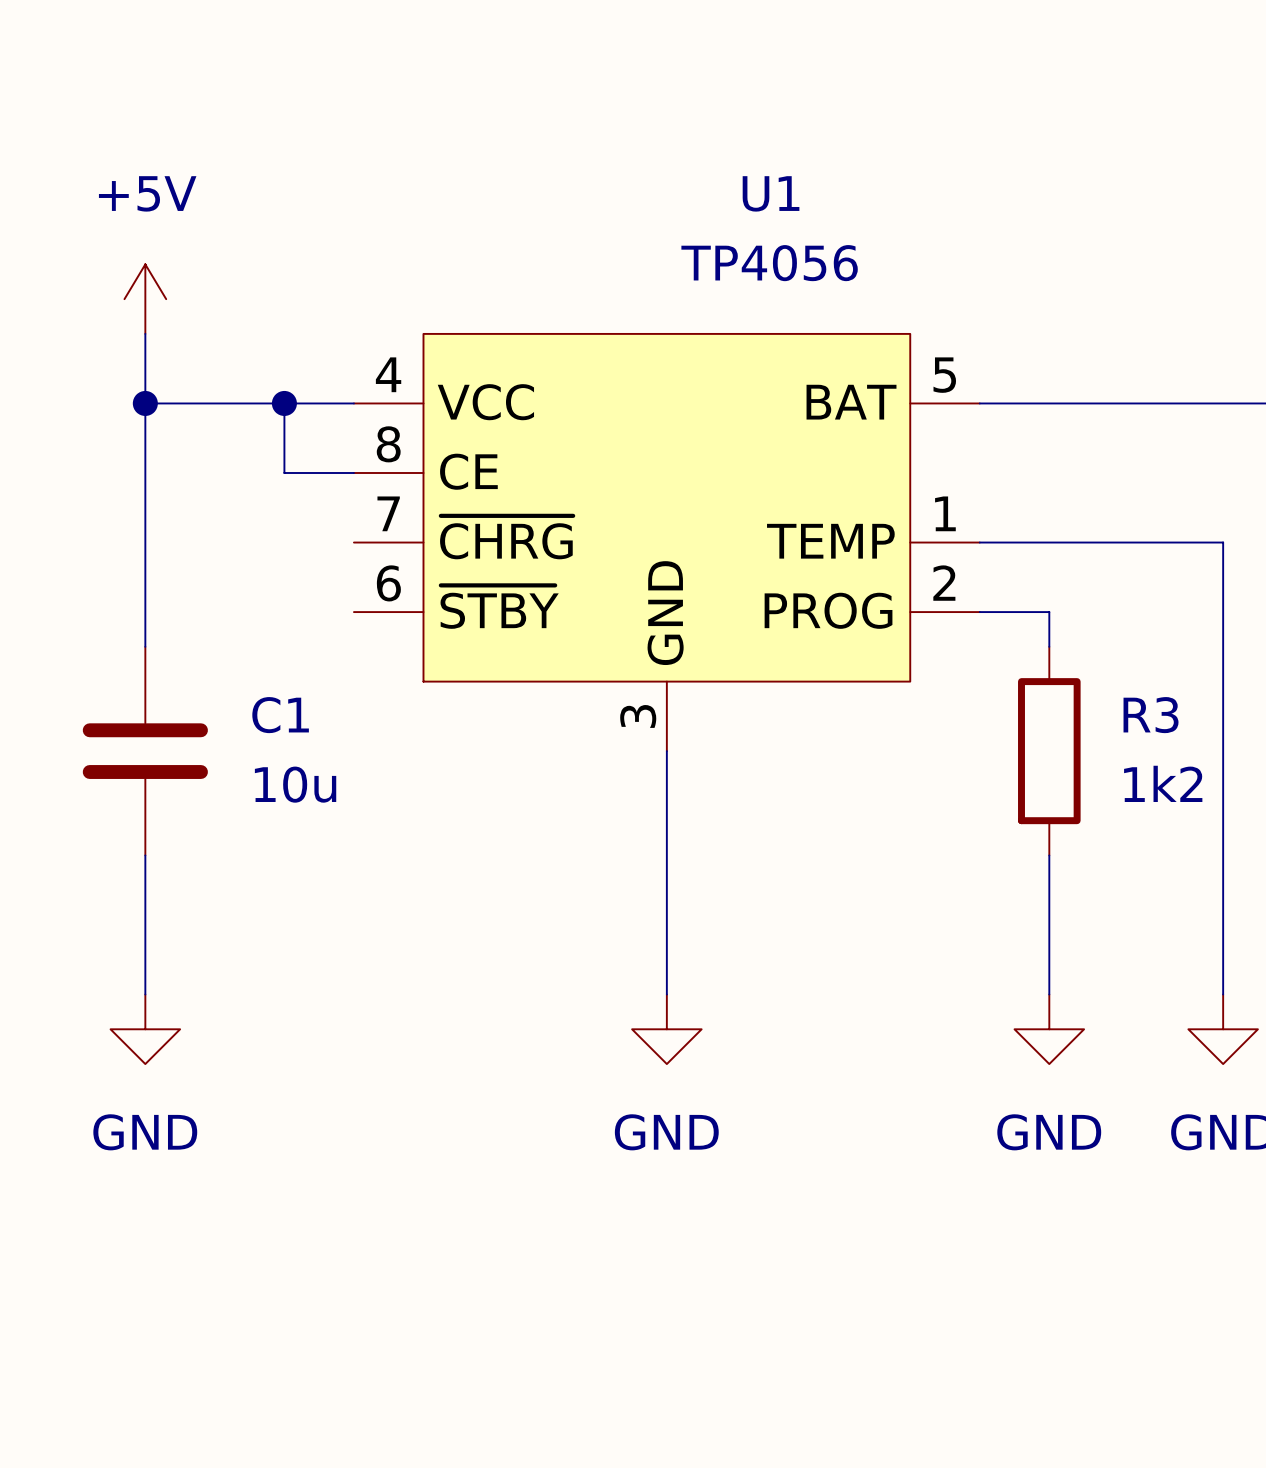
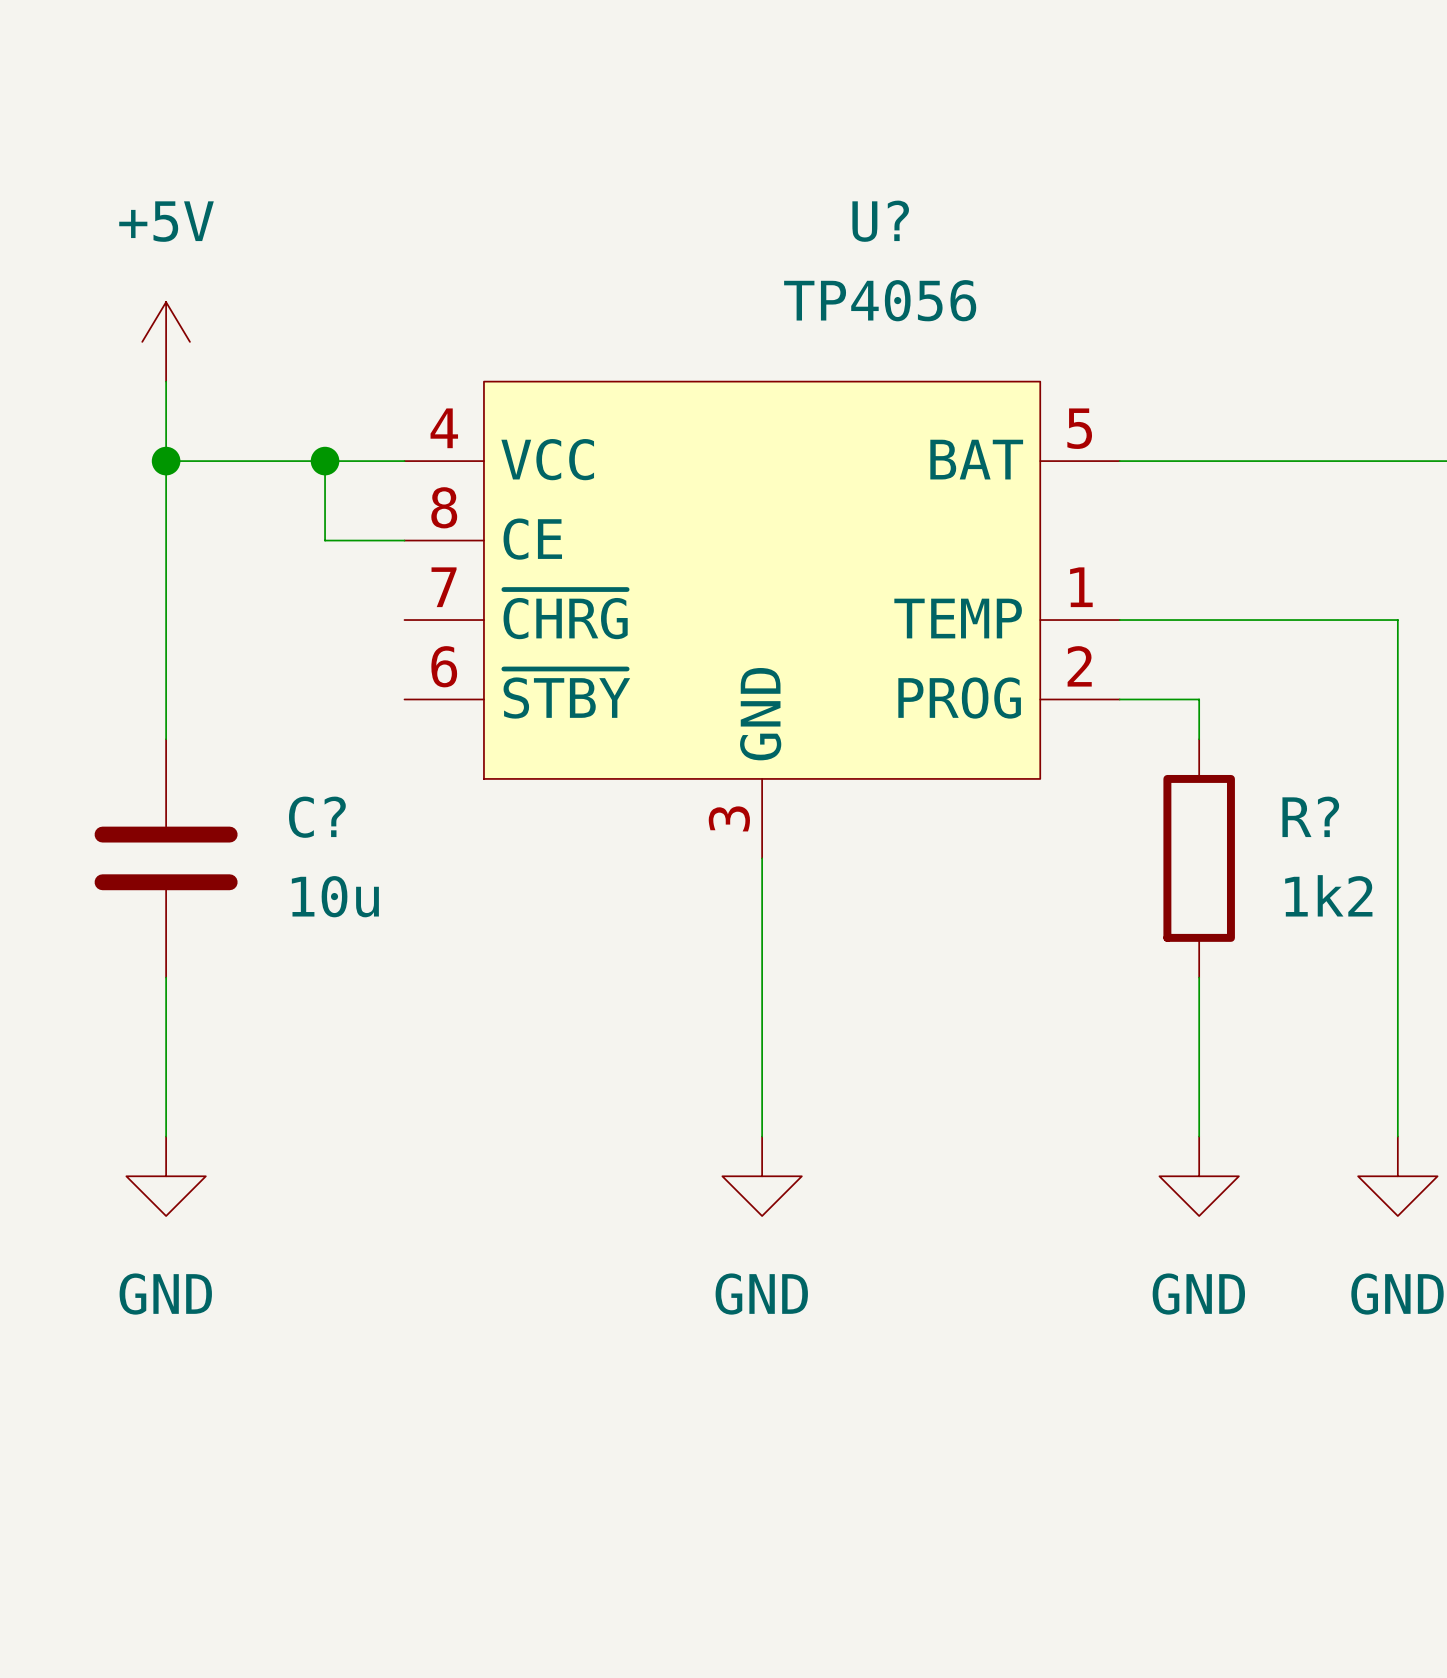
U1 name: U1 (771, 193) -> U? (880, 221)
C1 name: C1 (280, 715) -> C? (317, 817)
R3 name: R3 (1151, 715) -> R? (1310, 816)

